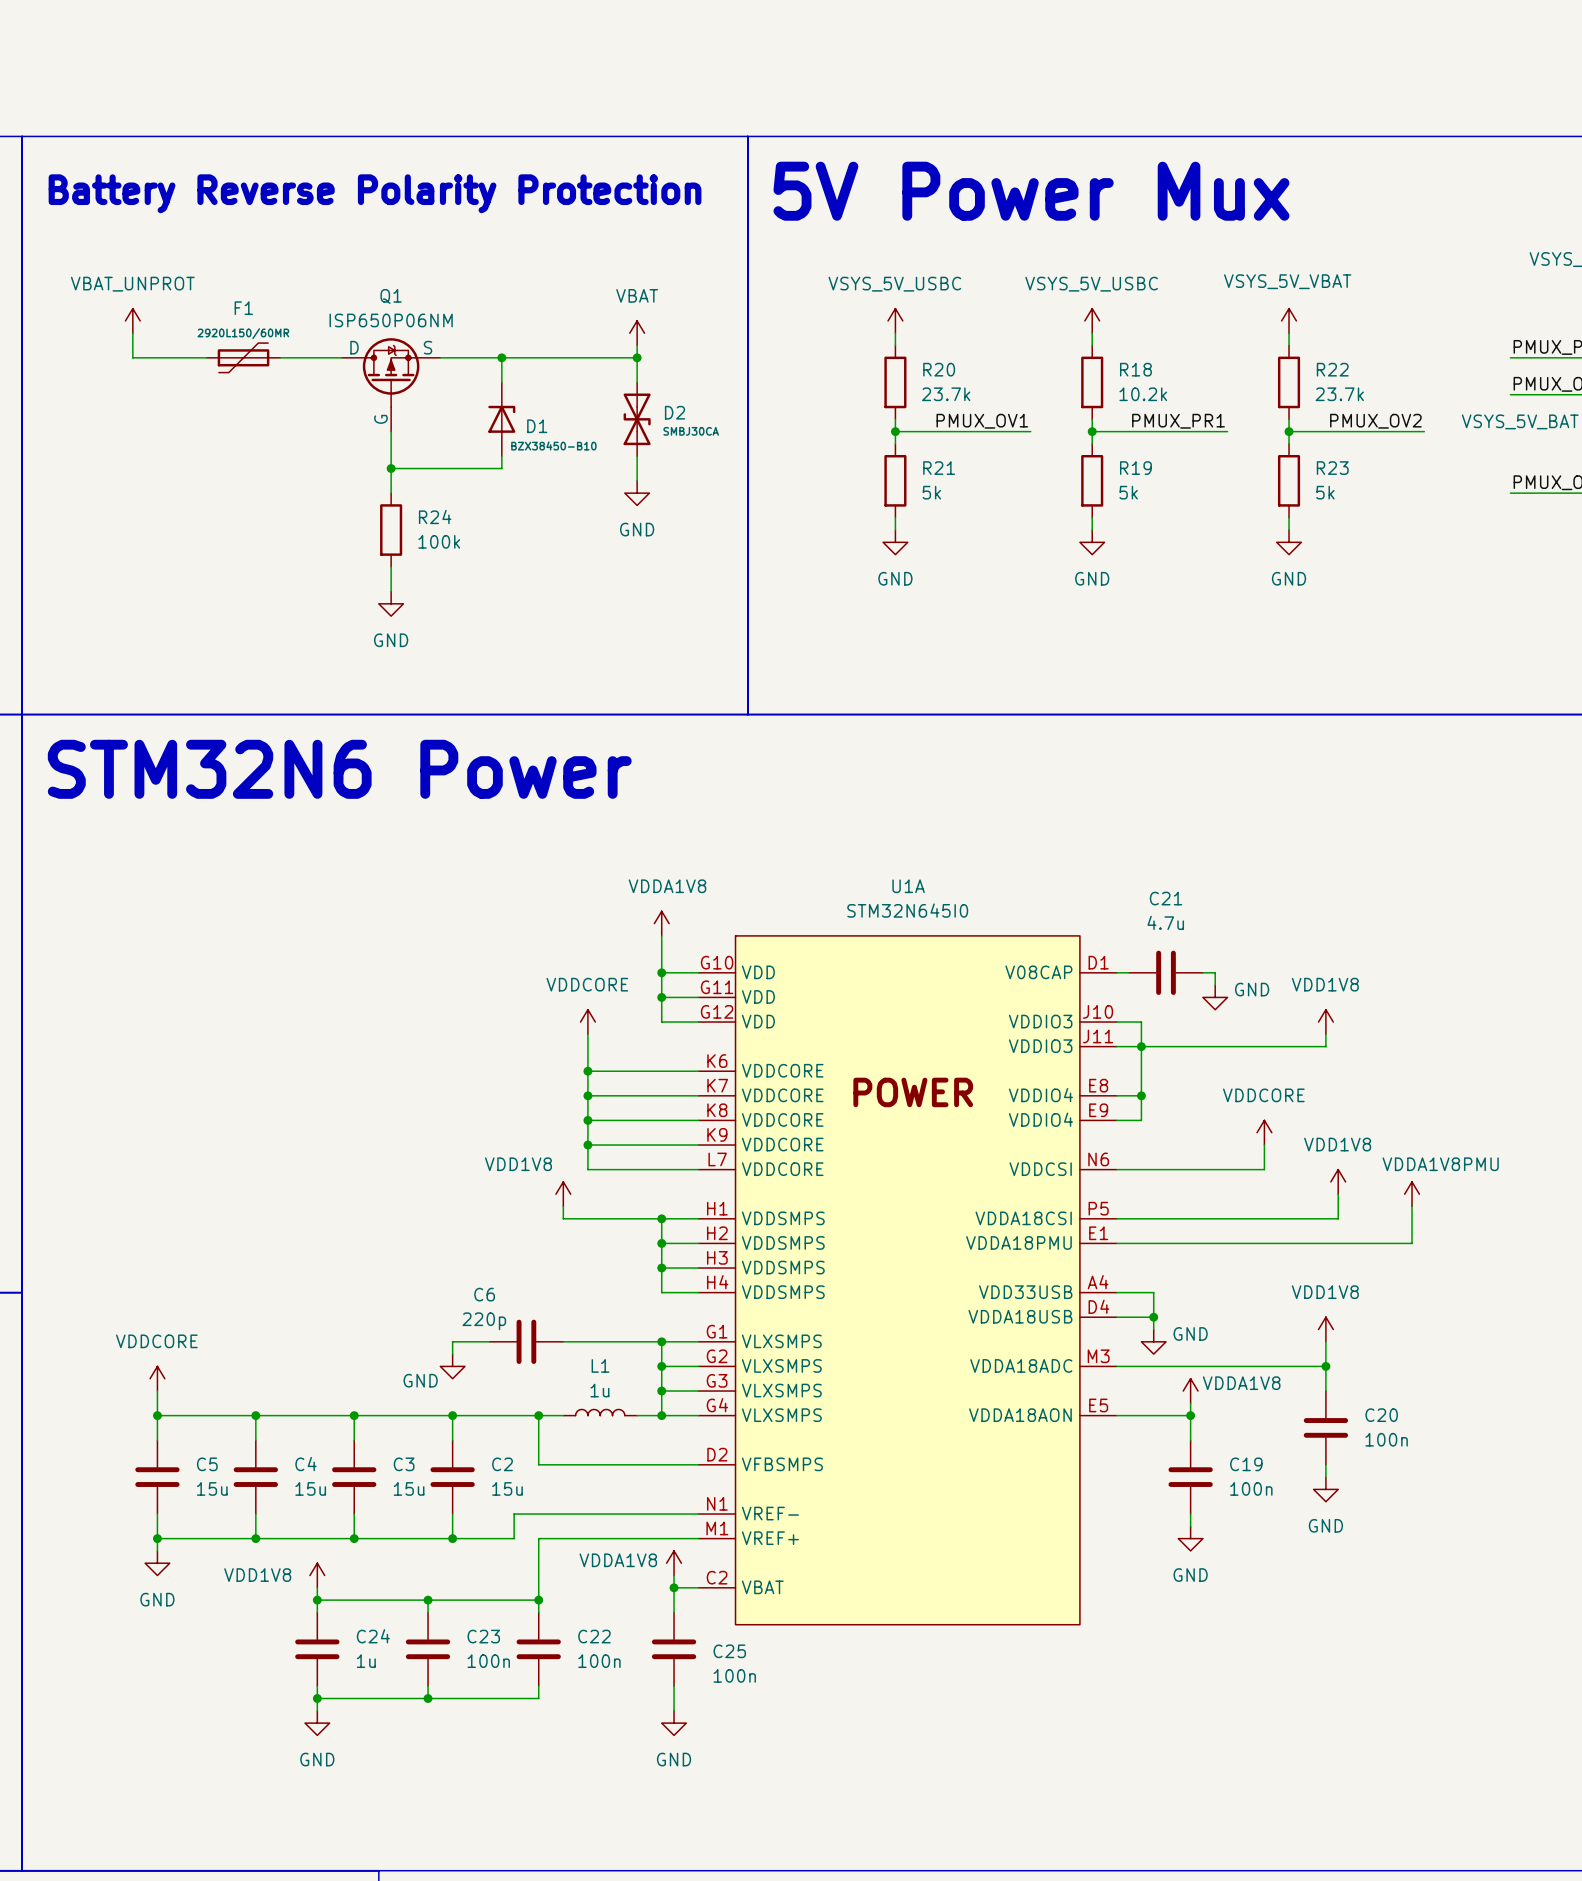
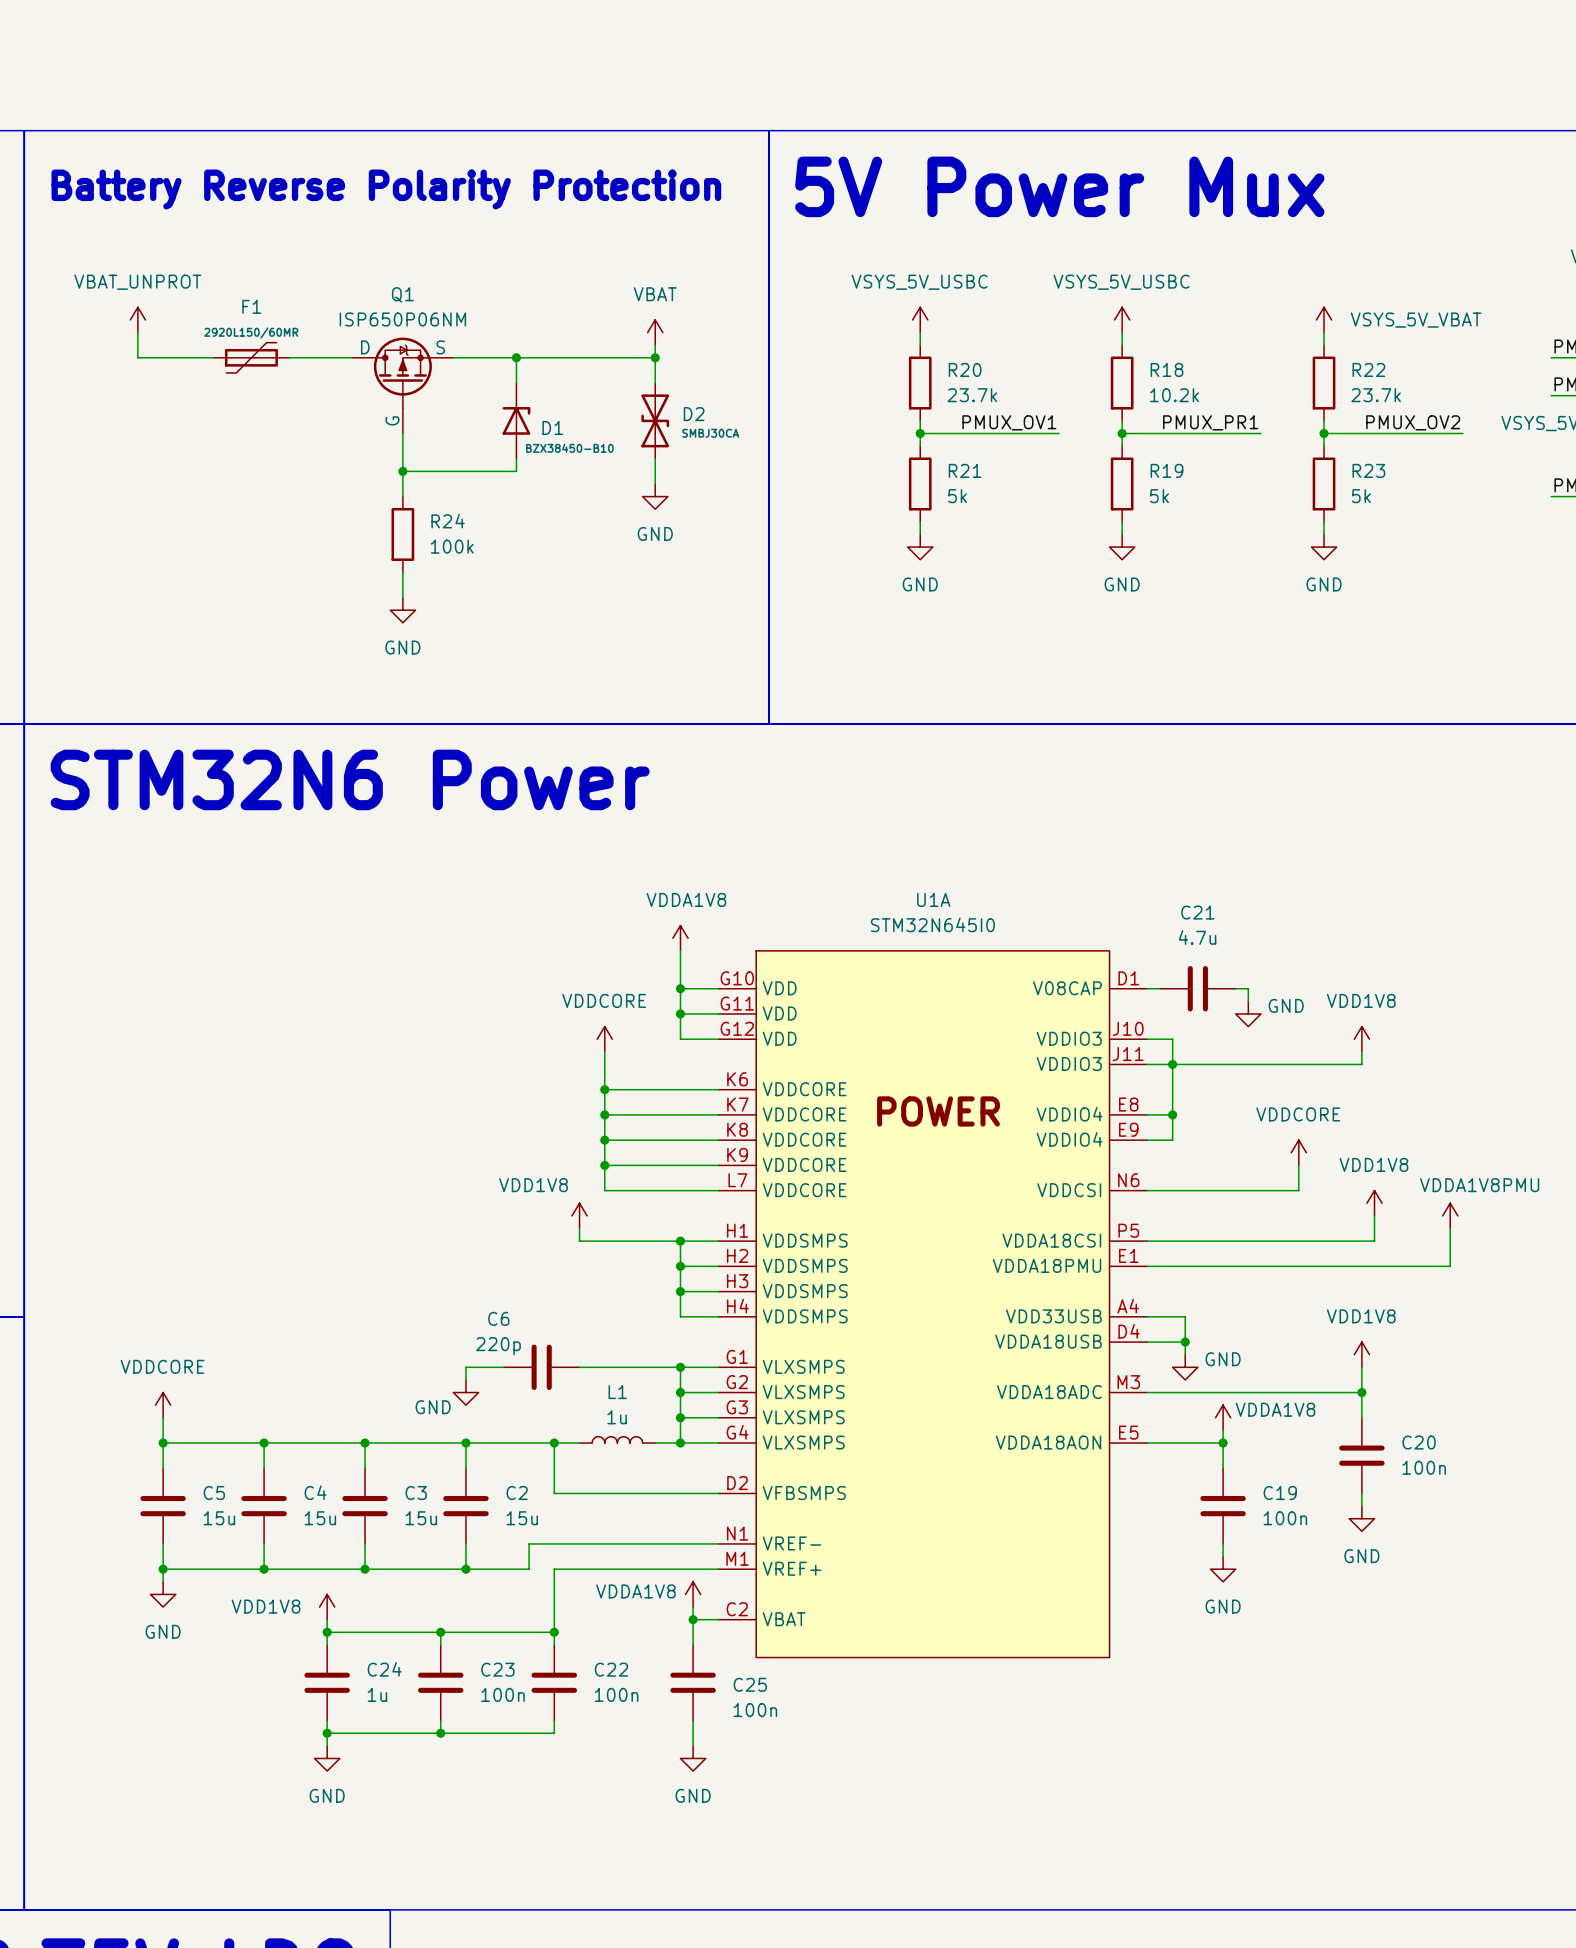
power symbol text position: VSYS_5V_VBAT (1287, 281) -> VSYS_5V_VBAT (1416, 320)

